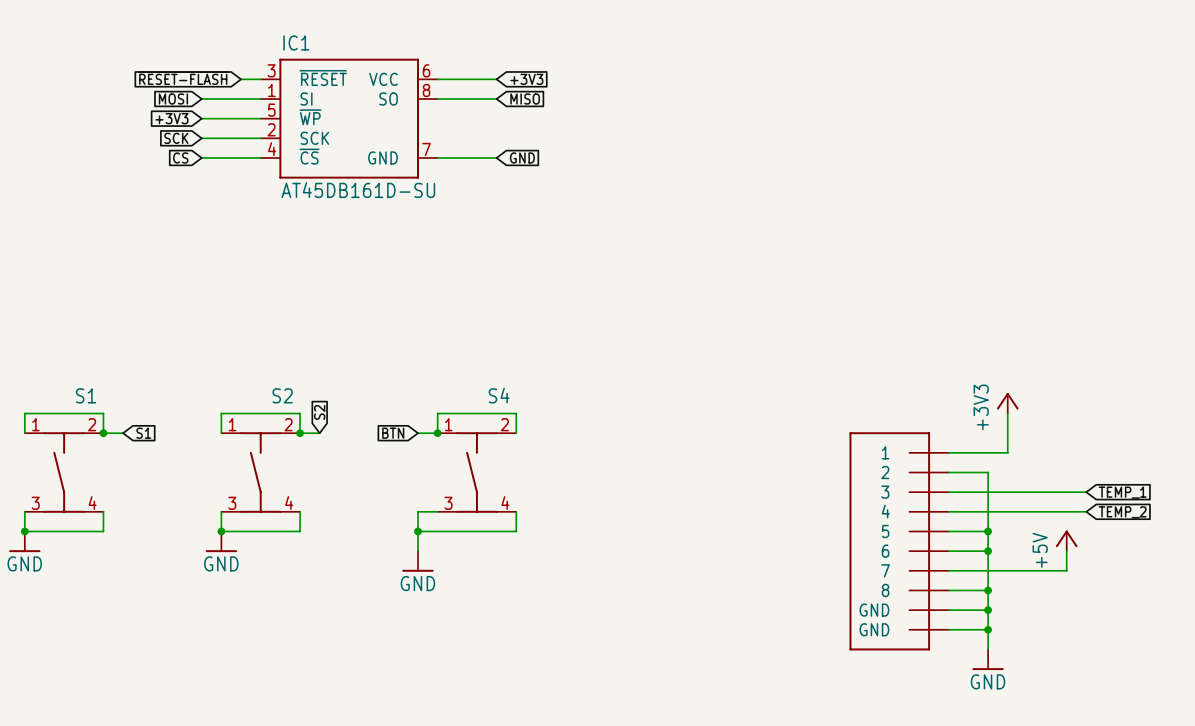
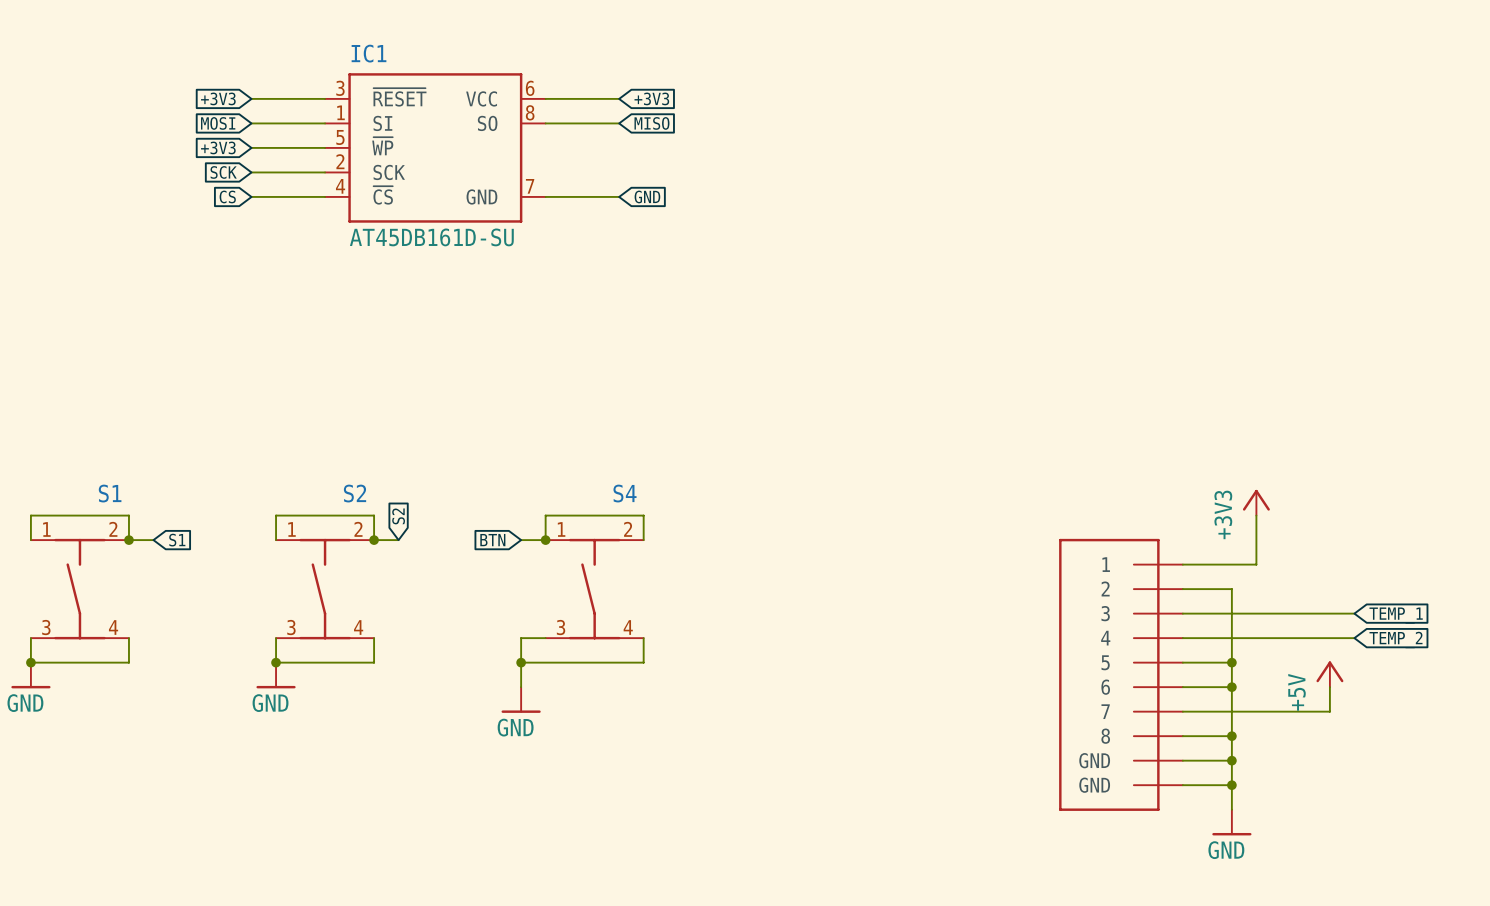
global label: ~{RESET-FLASH} (183, 78) -> none
global label: none -> +3V3 (218, 98)
wire: none -> (251, 98) (300, 98)

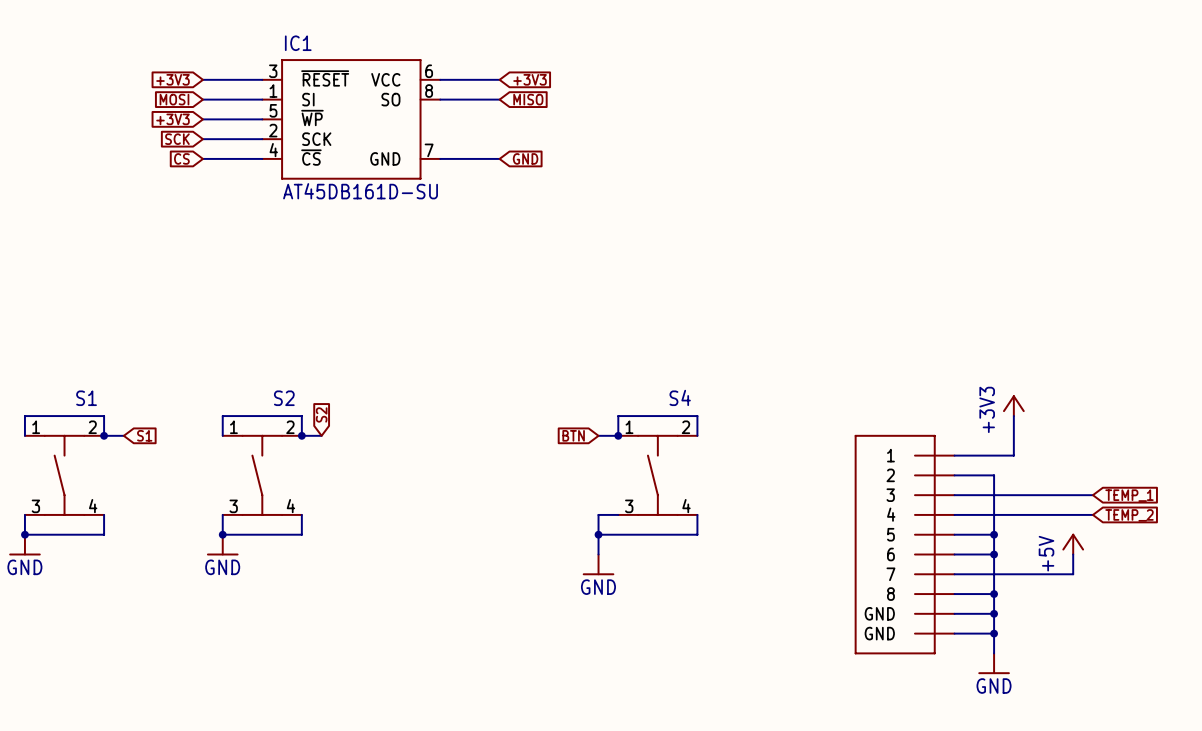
global label position: BTN (492, 540) -> BTN (573, 435)
wire: (521, 540) (545, 540) (545, 515) (643, 515) (643, 540) -> (598, 435) (618, 435) (618, 416) (697, 416) (697, 435)
junction: (545, 540) -> none
junction: none -> (618, 435)
S4 position: (594, 589) -> (657, 475)
wire: (545, 638) (521, 638) (521, 687) -> (618, 514) (598, 514) (598, 554)
wire: (643, 638) (643, 662) (521, 662) -> (697, 514) (697, 534) (598, 534)
junction: (521, 662) -> none
junction: none -> (598, 534)
power symbol position: GND (521, 700) -> GND (598, 564)

